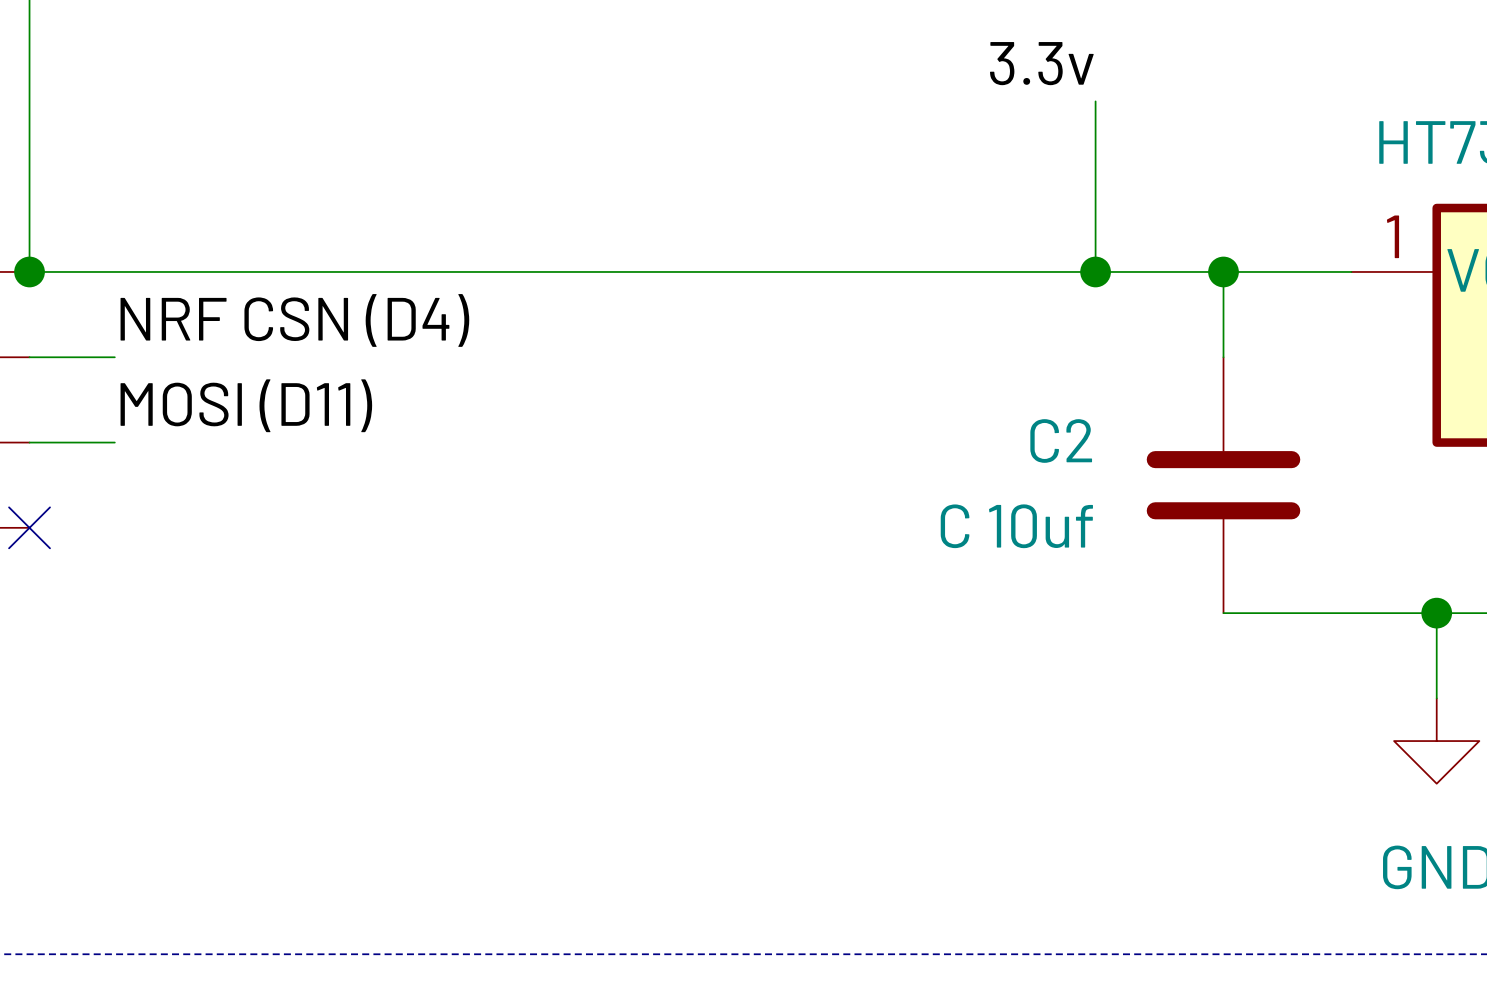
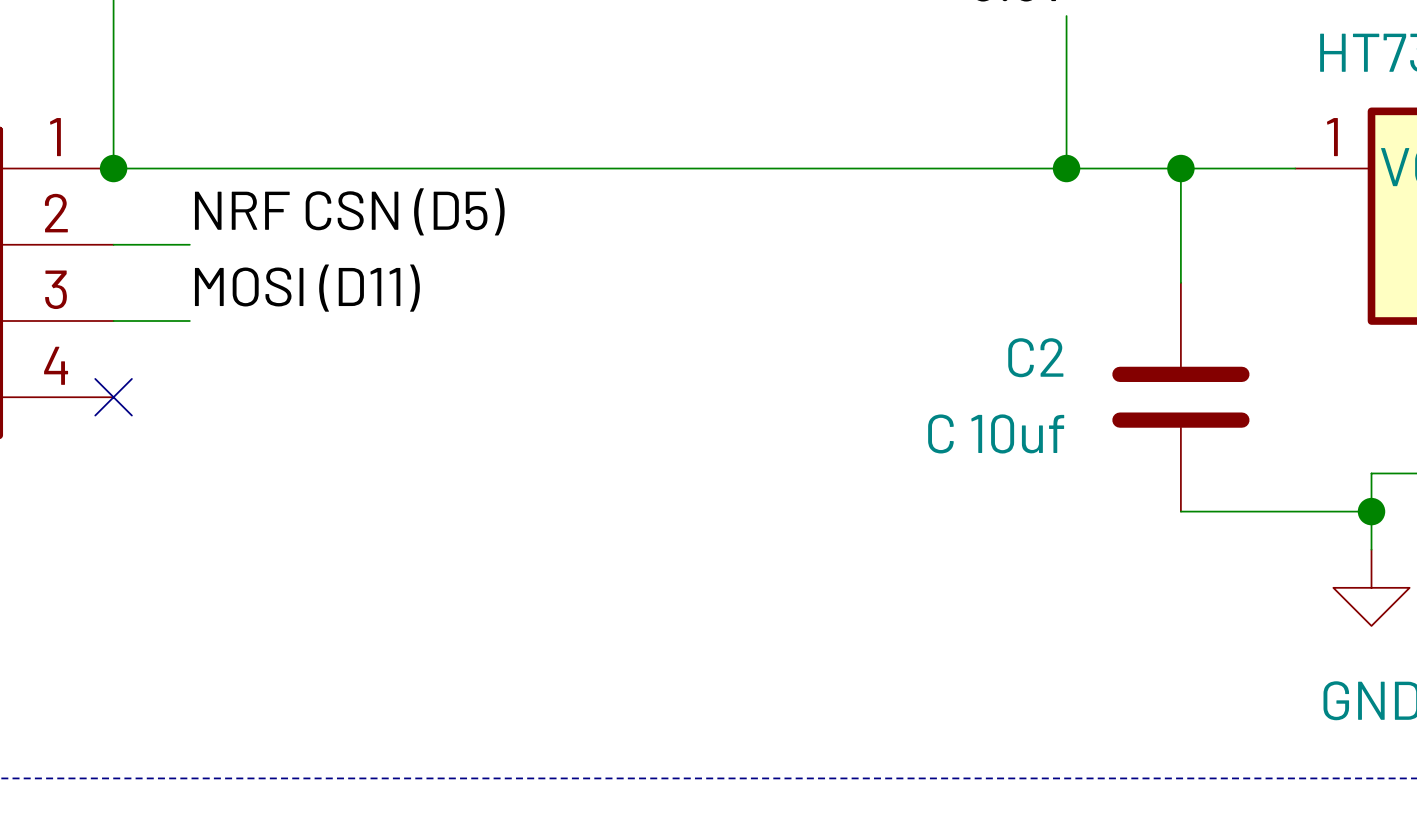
label: NRF CSN (D4) (294, 320) -> NRF CSN (D5) (349, 211)
C2 position: (1223, 485) -> (1180, 397)
wire: (1223, 613) (1436, 613) -> (1180, 511) (1371, 511)
junction position: (1436, 613) -> (1371, 511)

